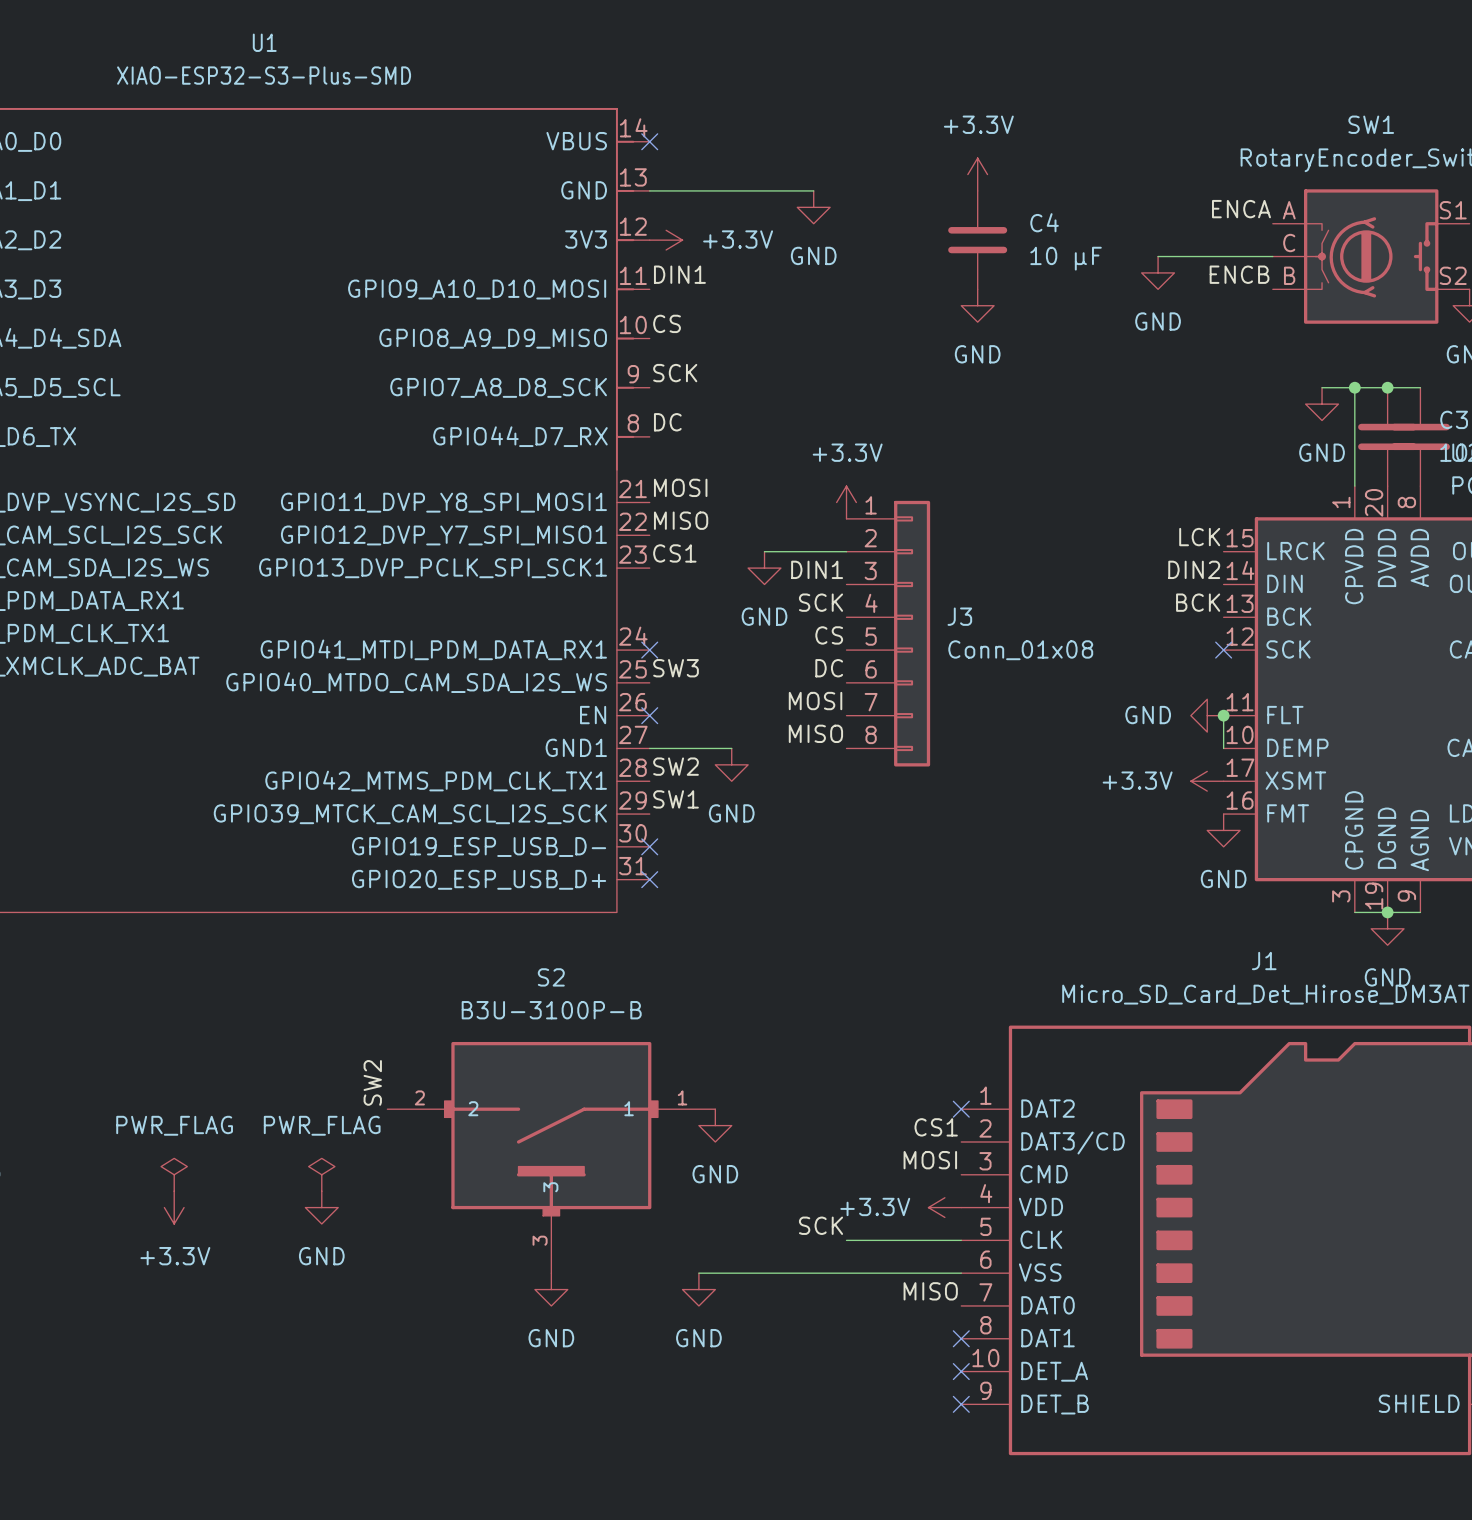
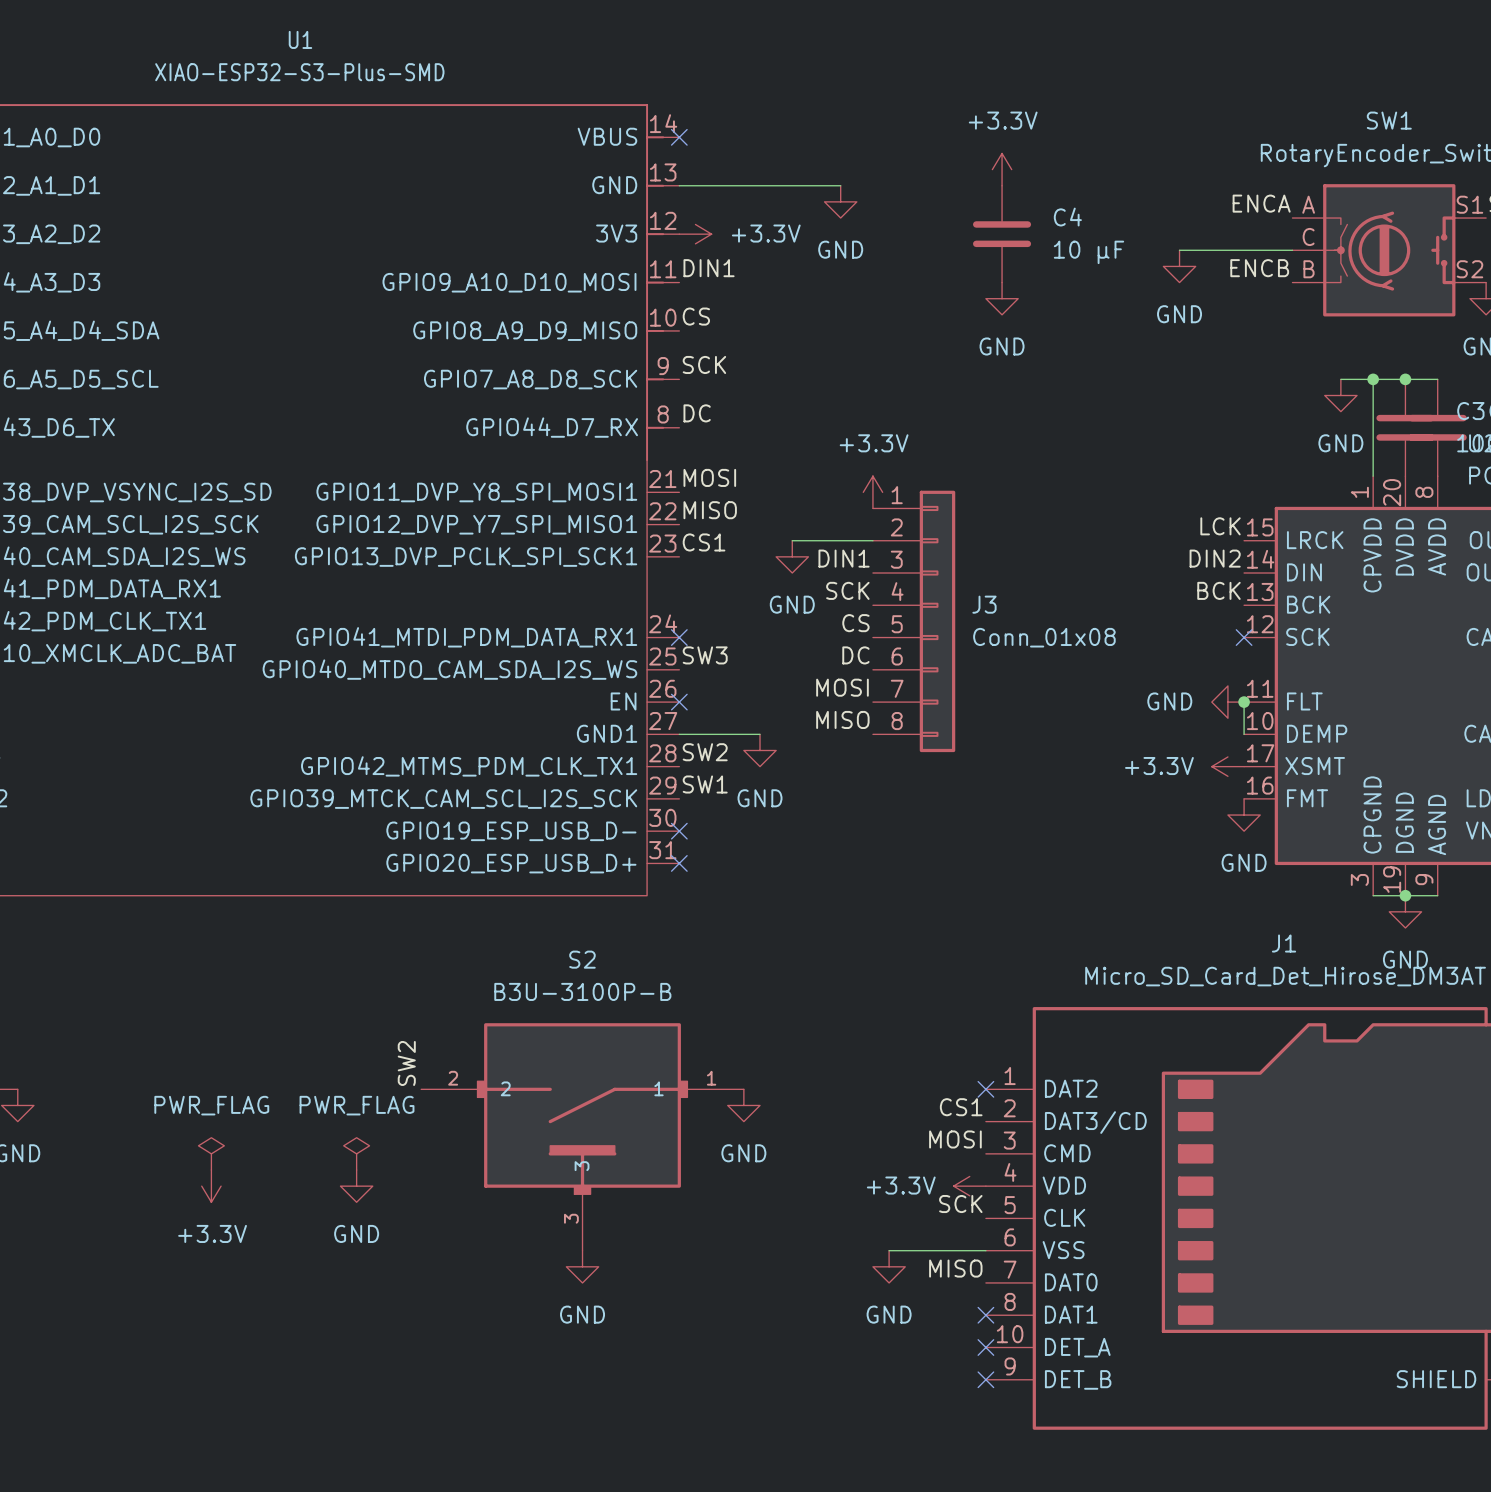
label position: SCK (821, 1225) -> SCK (960, 1204)
wire: (846, 1240) (961, 1240) -> none
wire: (698, 1273) (862, 1273) -> none
power symbol position: GND (698, 1289) -> GND (889, 1266)

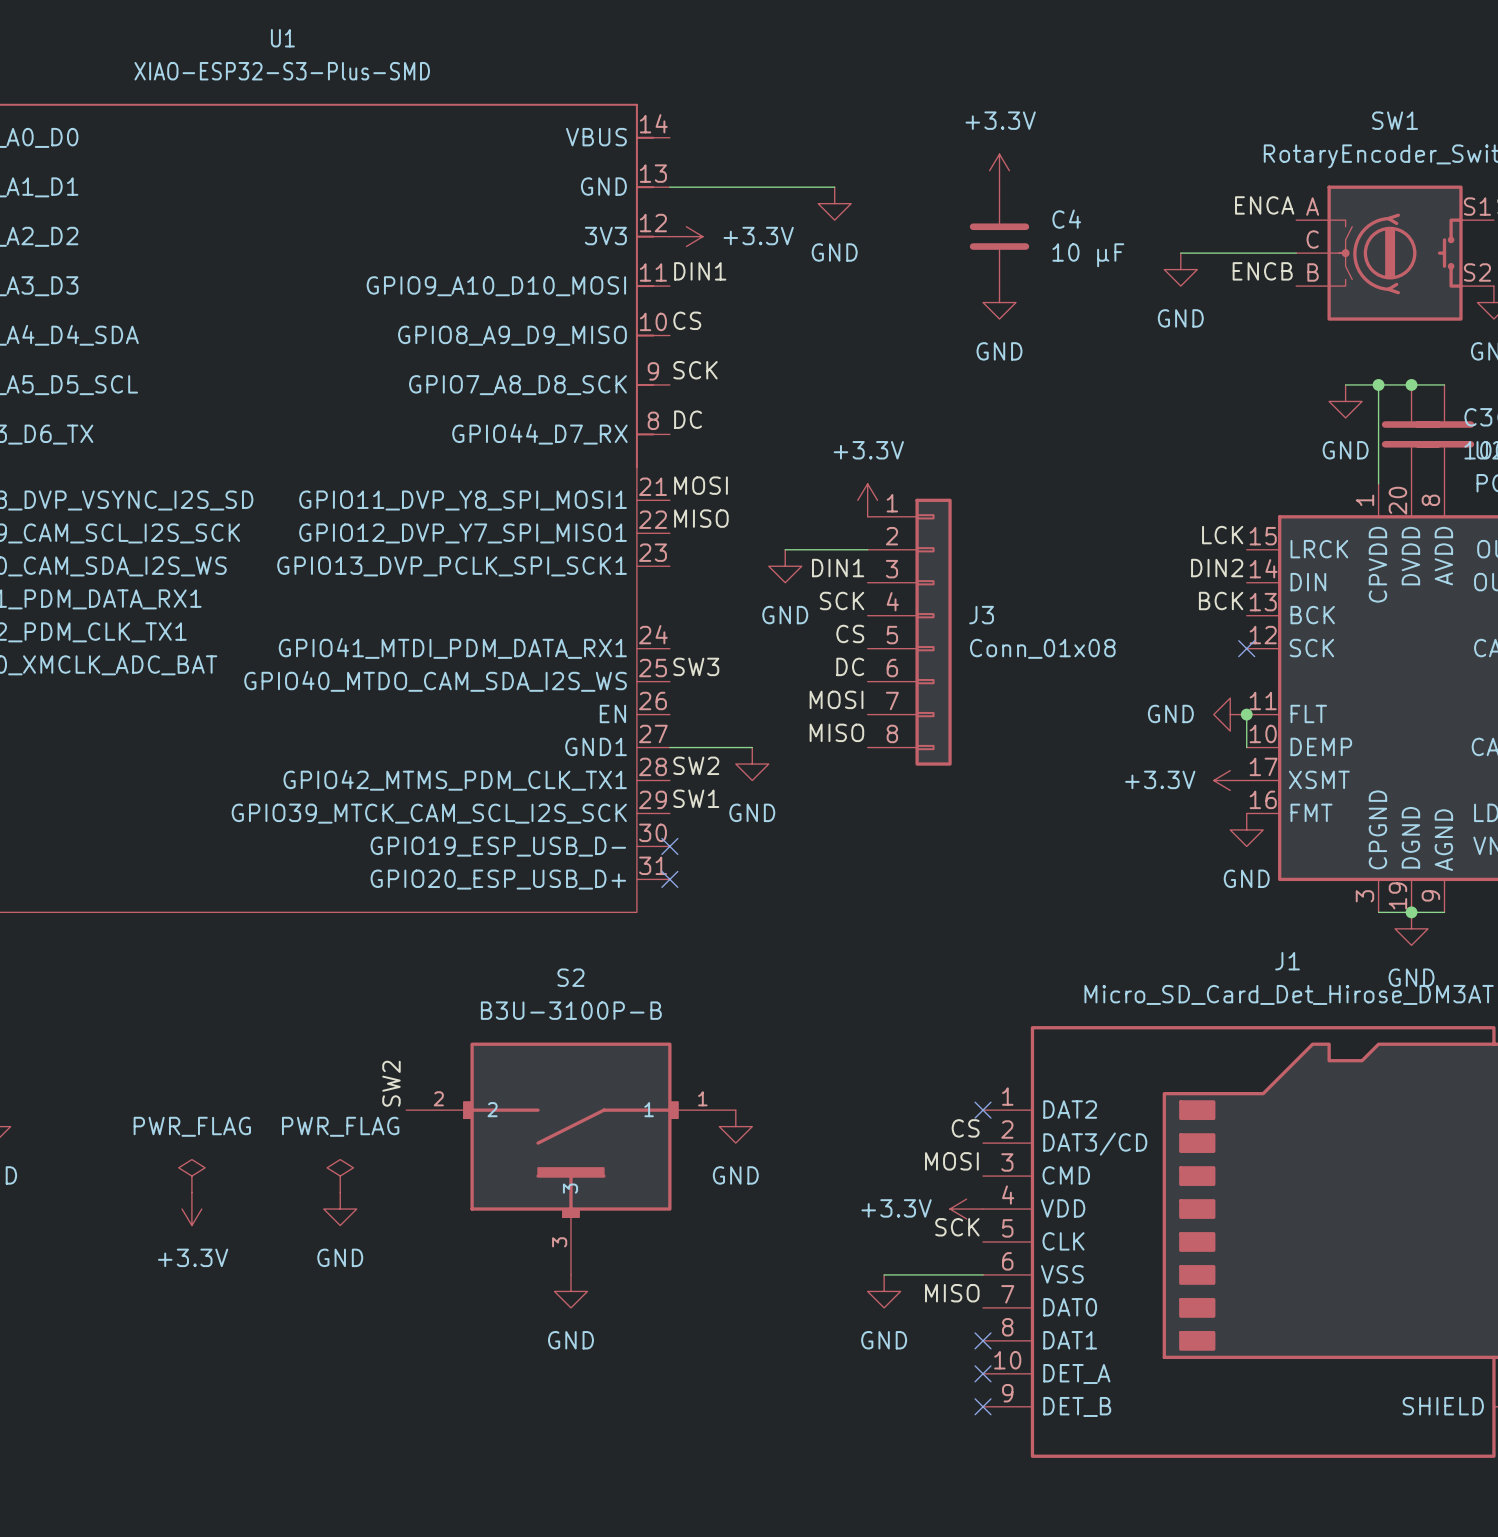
no-connect mark: (679, 137) -> none
label: CS1 (704, 542) -> none
no-connect mark: (679, 637) -> none
no-connect mark: (679, 702) -> none
label: CS1 (961, 1107) -> CS (965, 1128)

